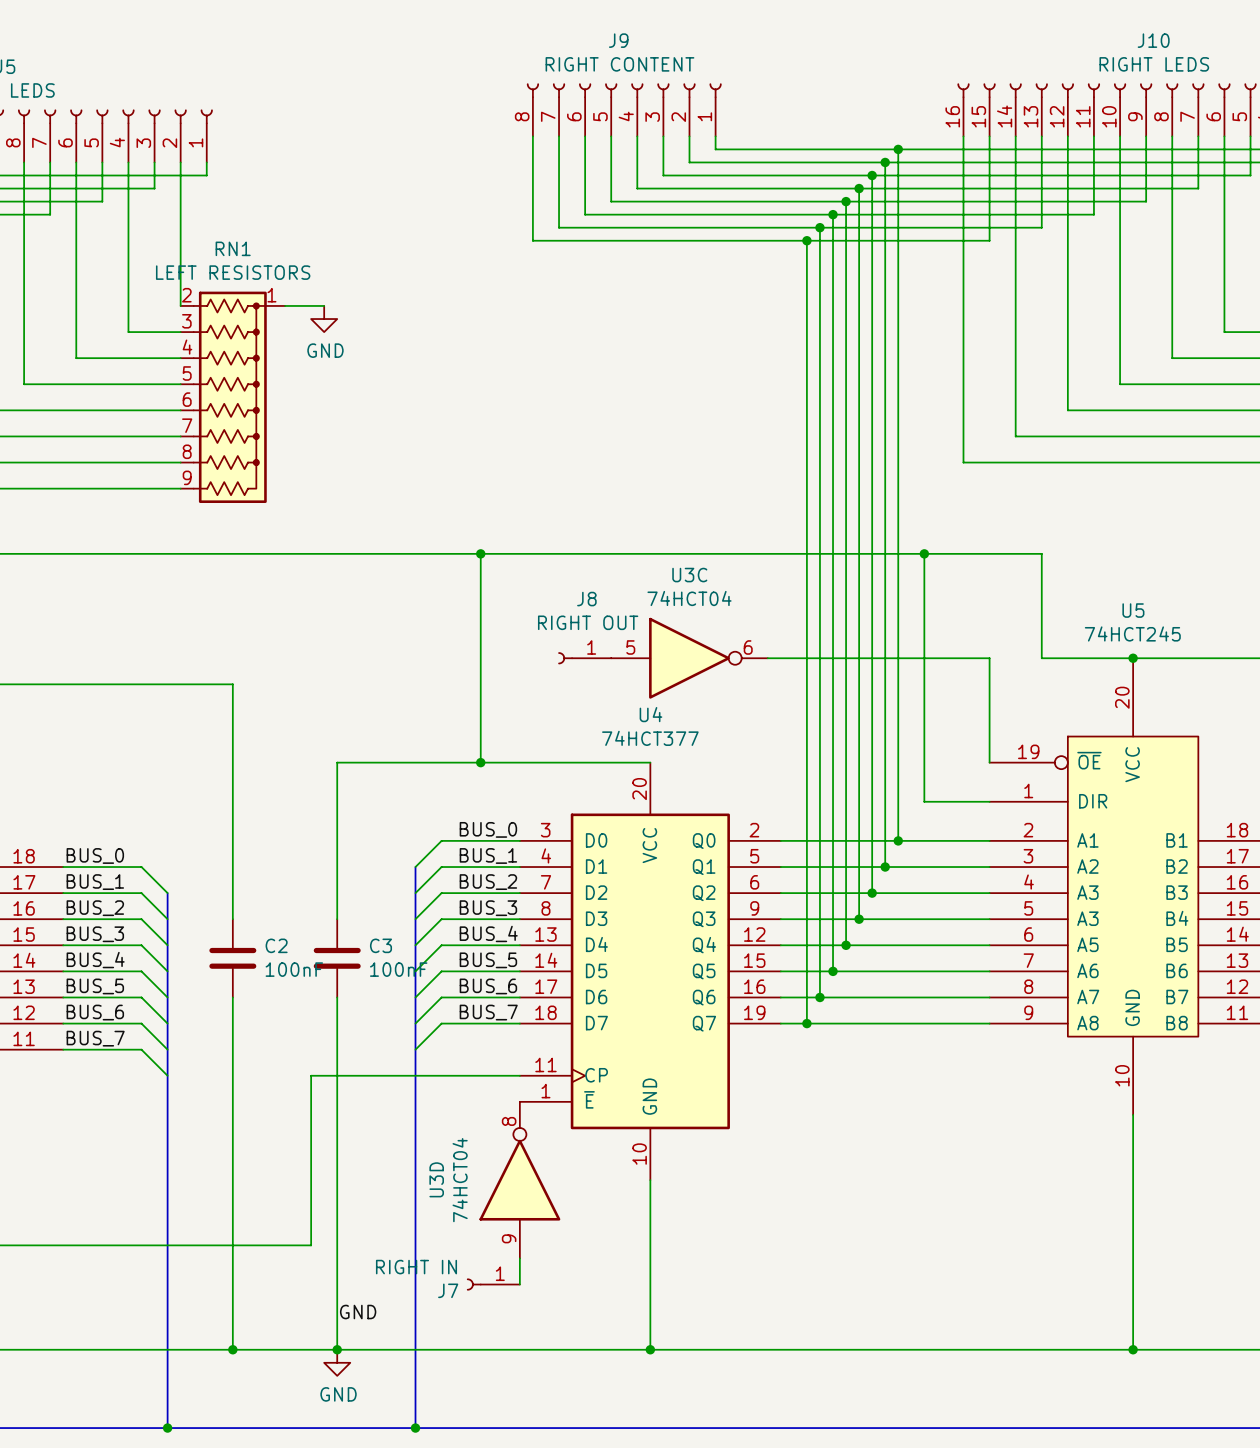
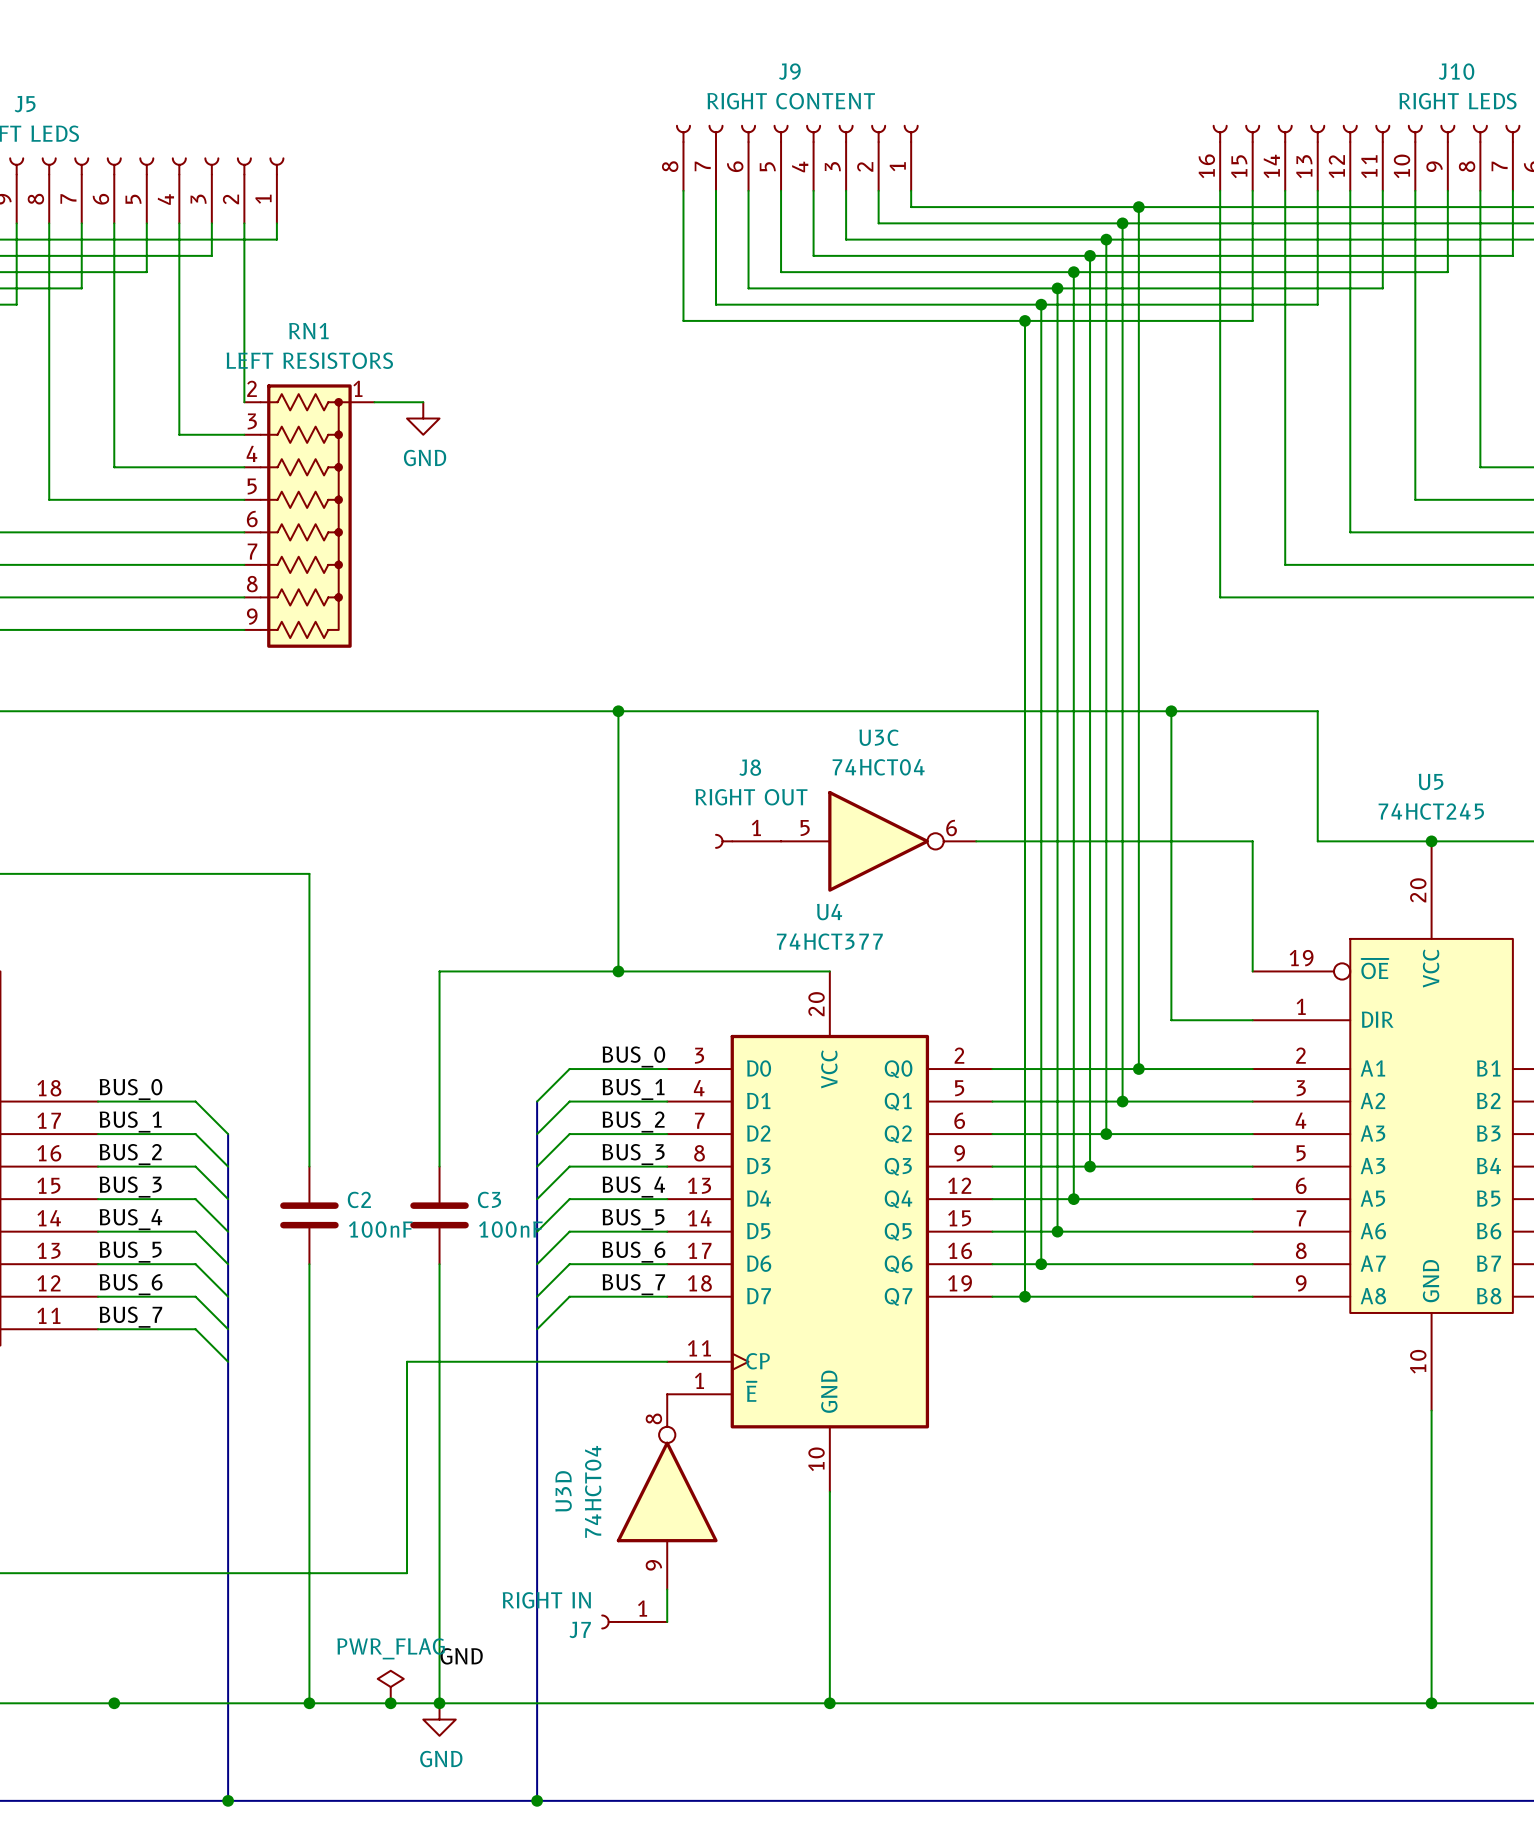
power symbol: none -> PWR_FLAG (390, 1687)
junction: none -> (114, 1703)
junction: none -> (390, 1703)

